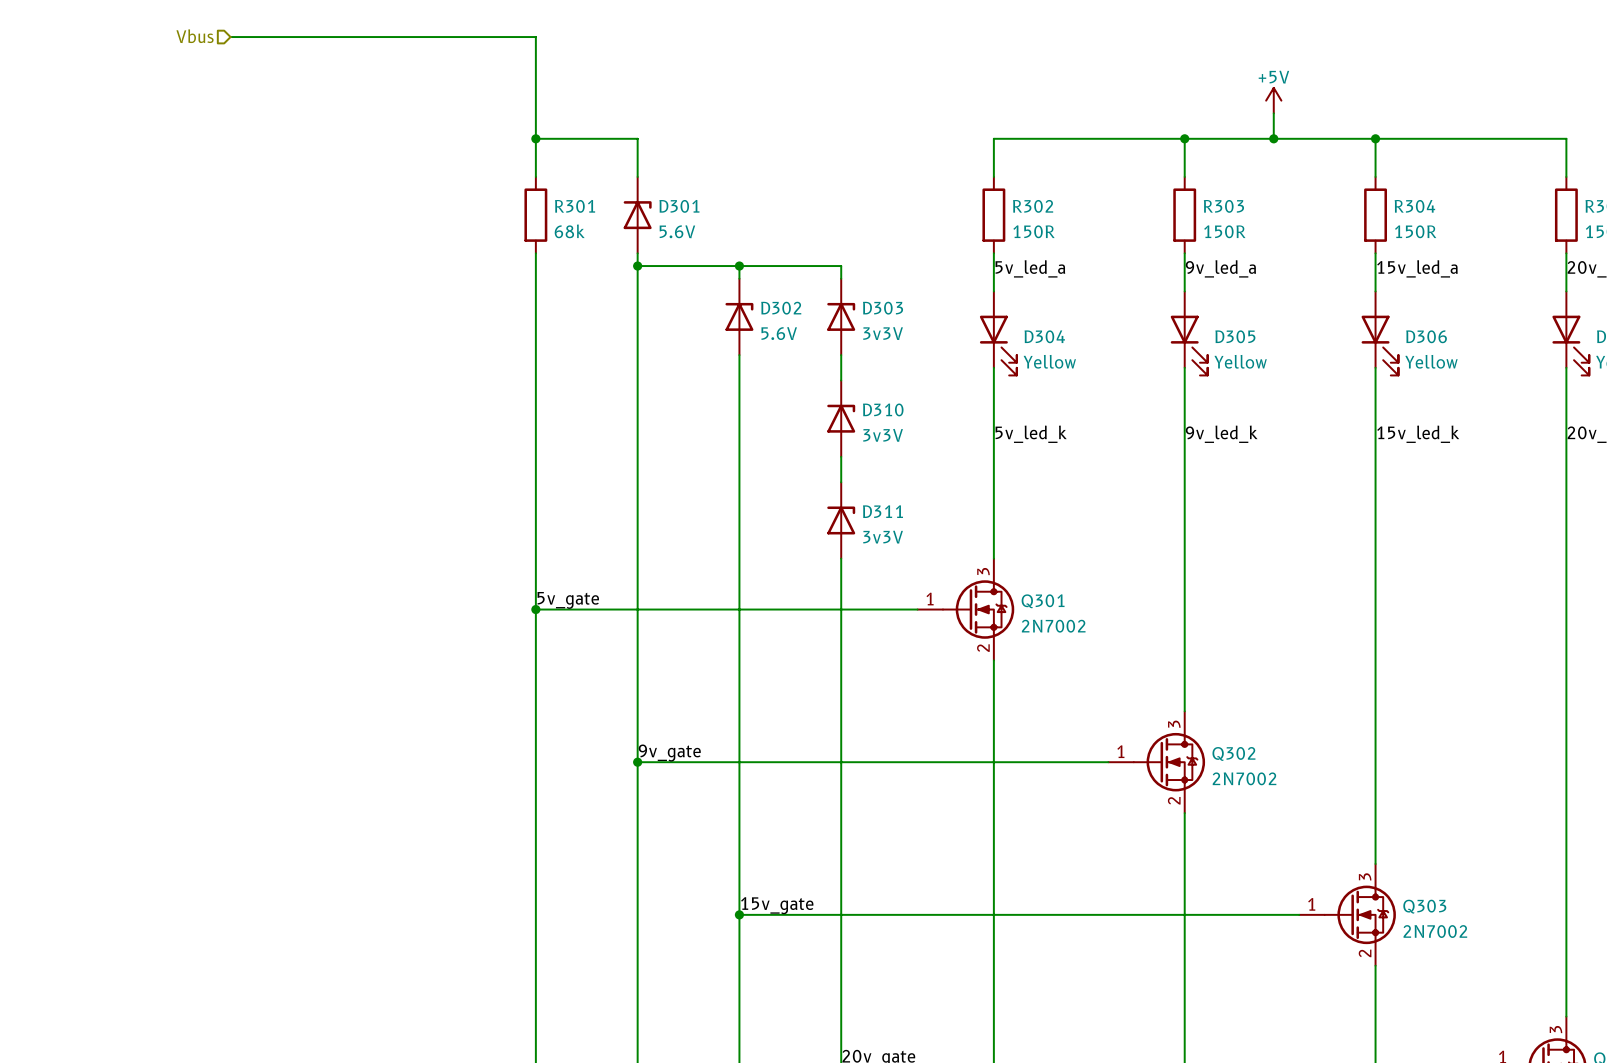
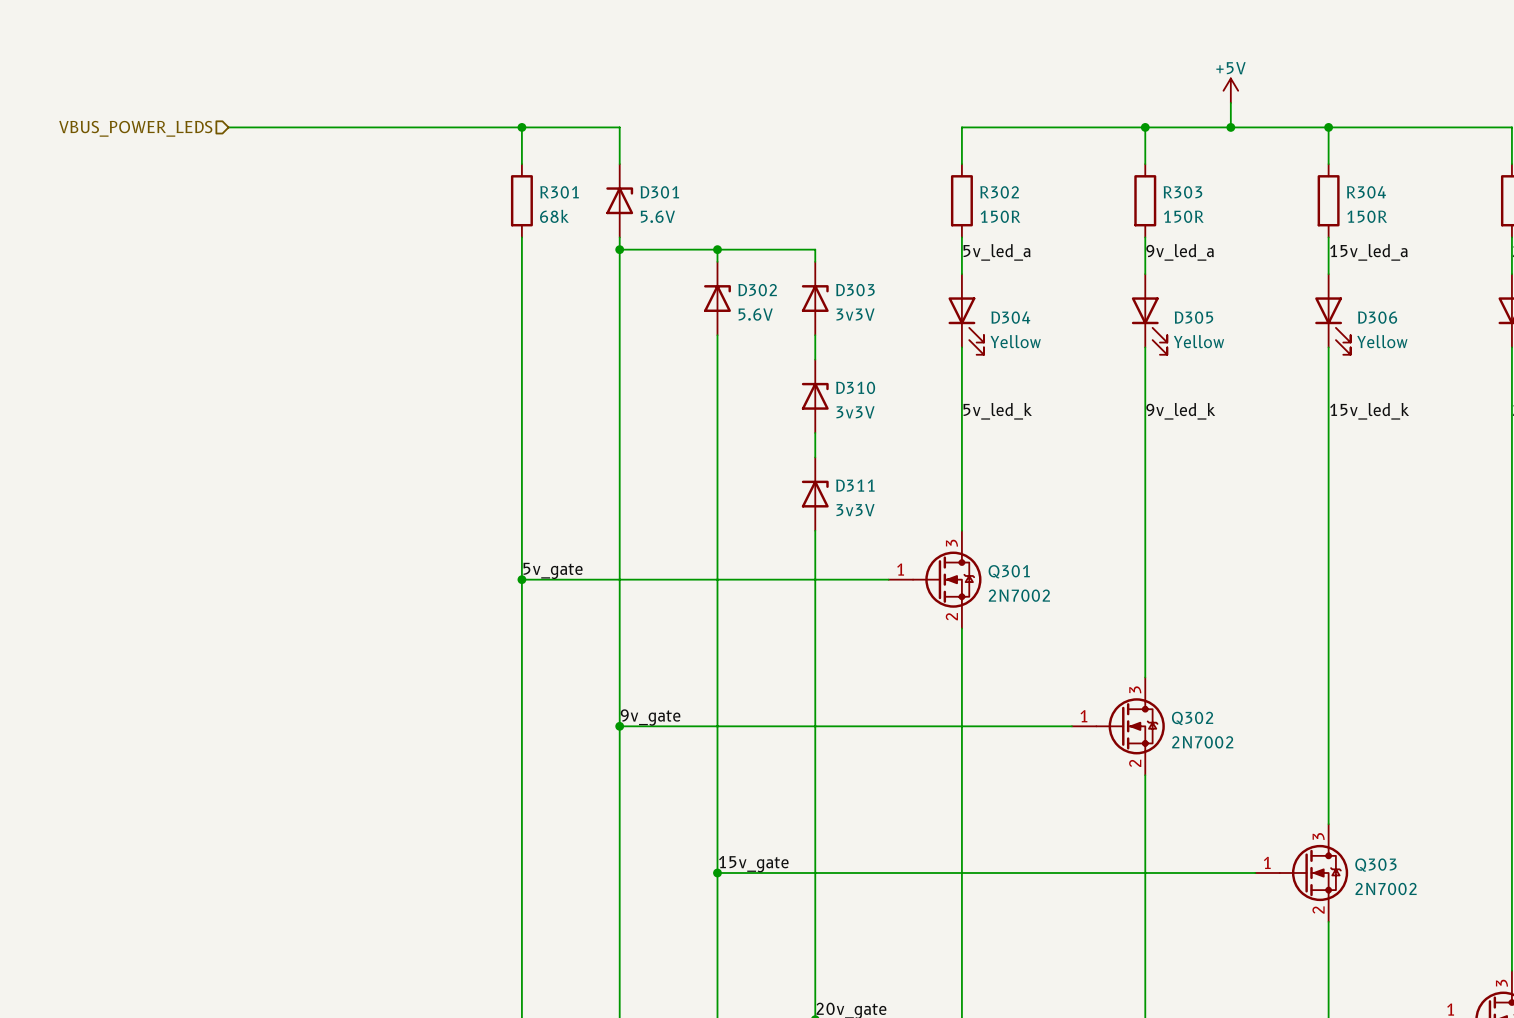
hierarchical label: Vbus (195, 36) -> none
wire: (230, 37) (535, 37) (535, 138) -> (228, 127) (521, 127)
hierarchical label: none -> VBUS_POWER_LEDS (135, 128)

